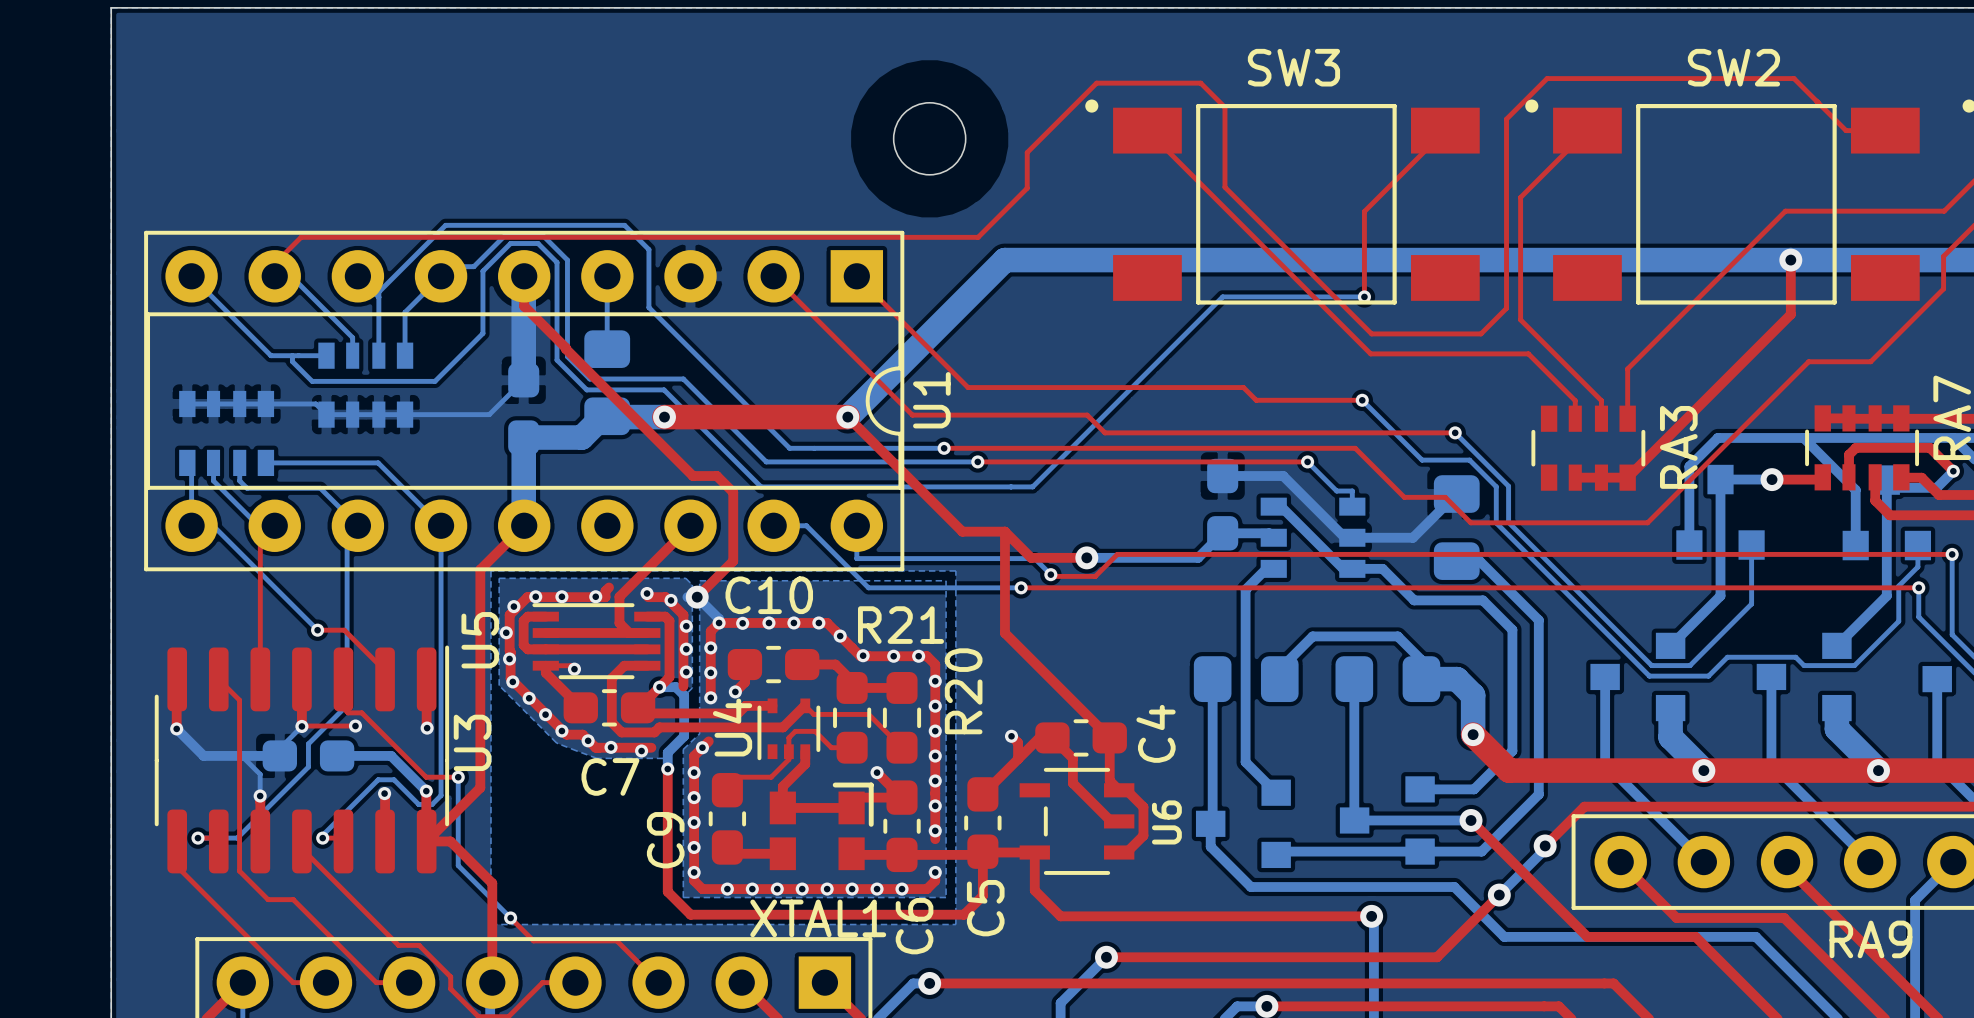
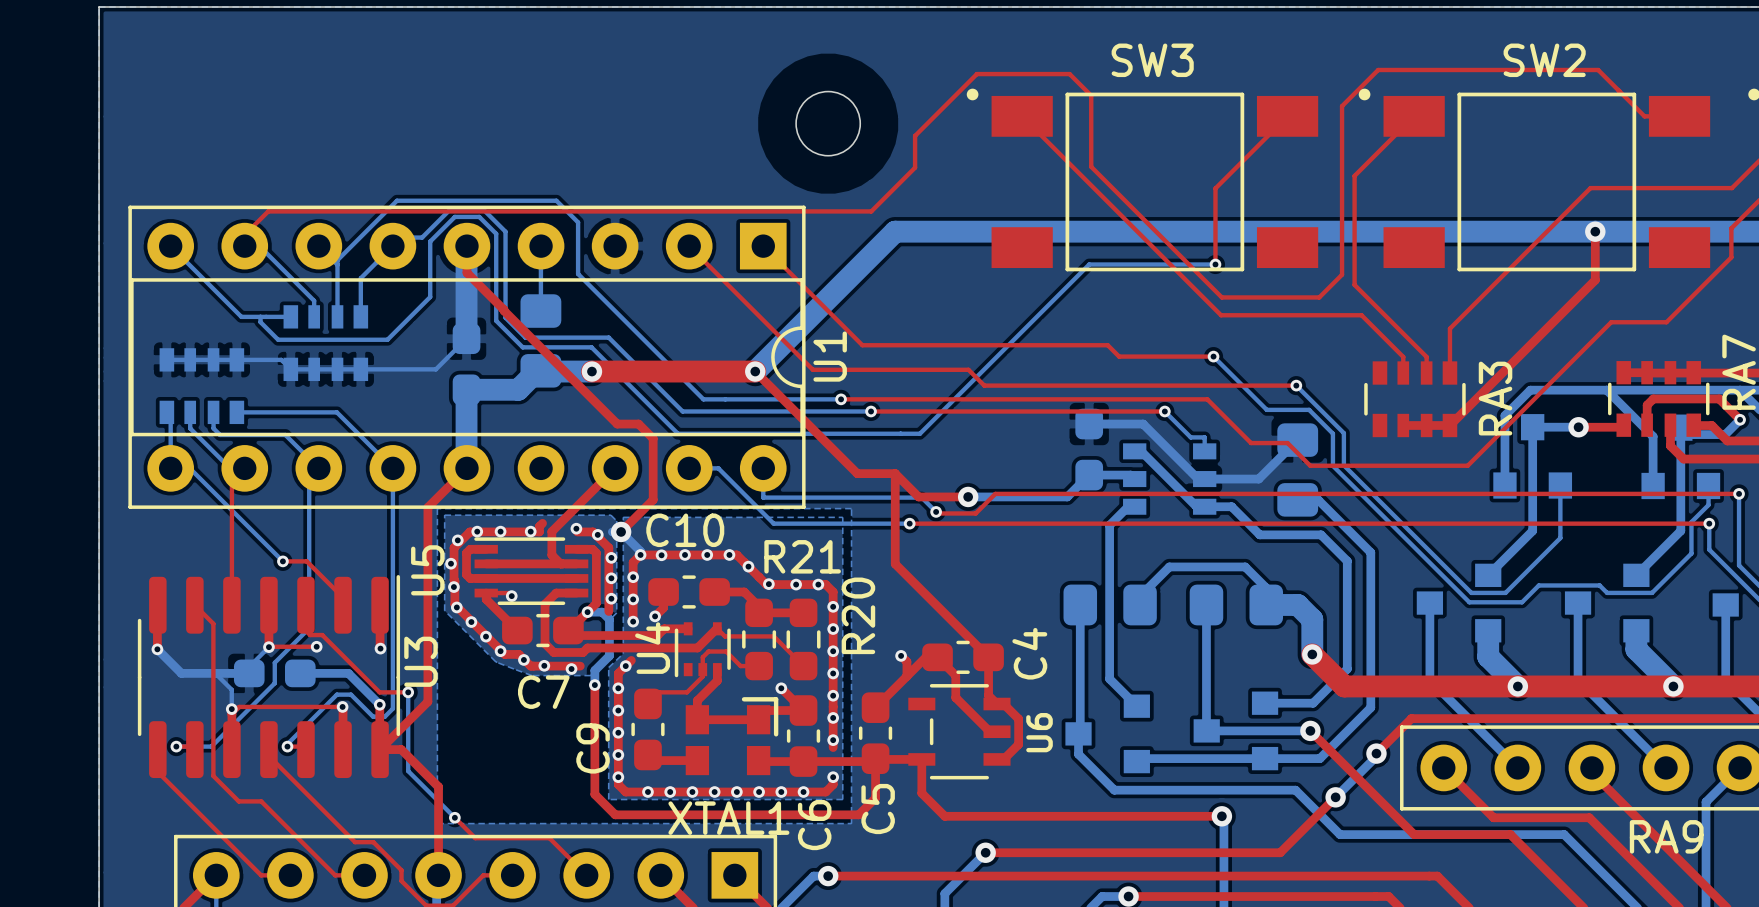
top track: none -> (342, 706) (239, 706) (231, 714)

